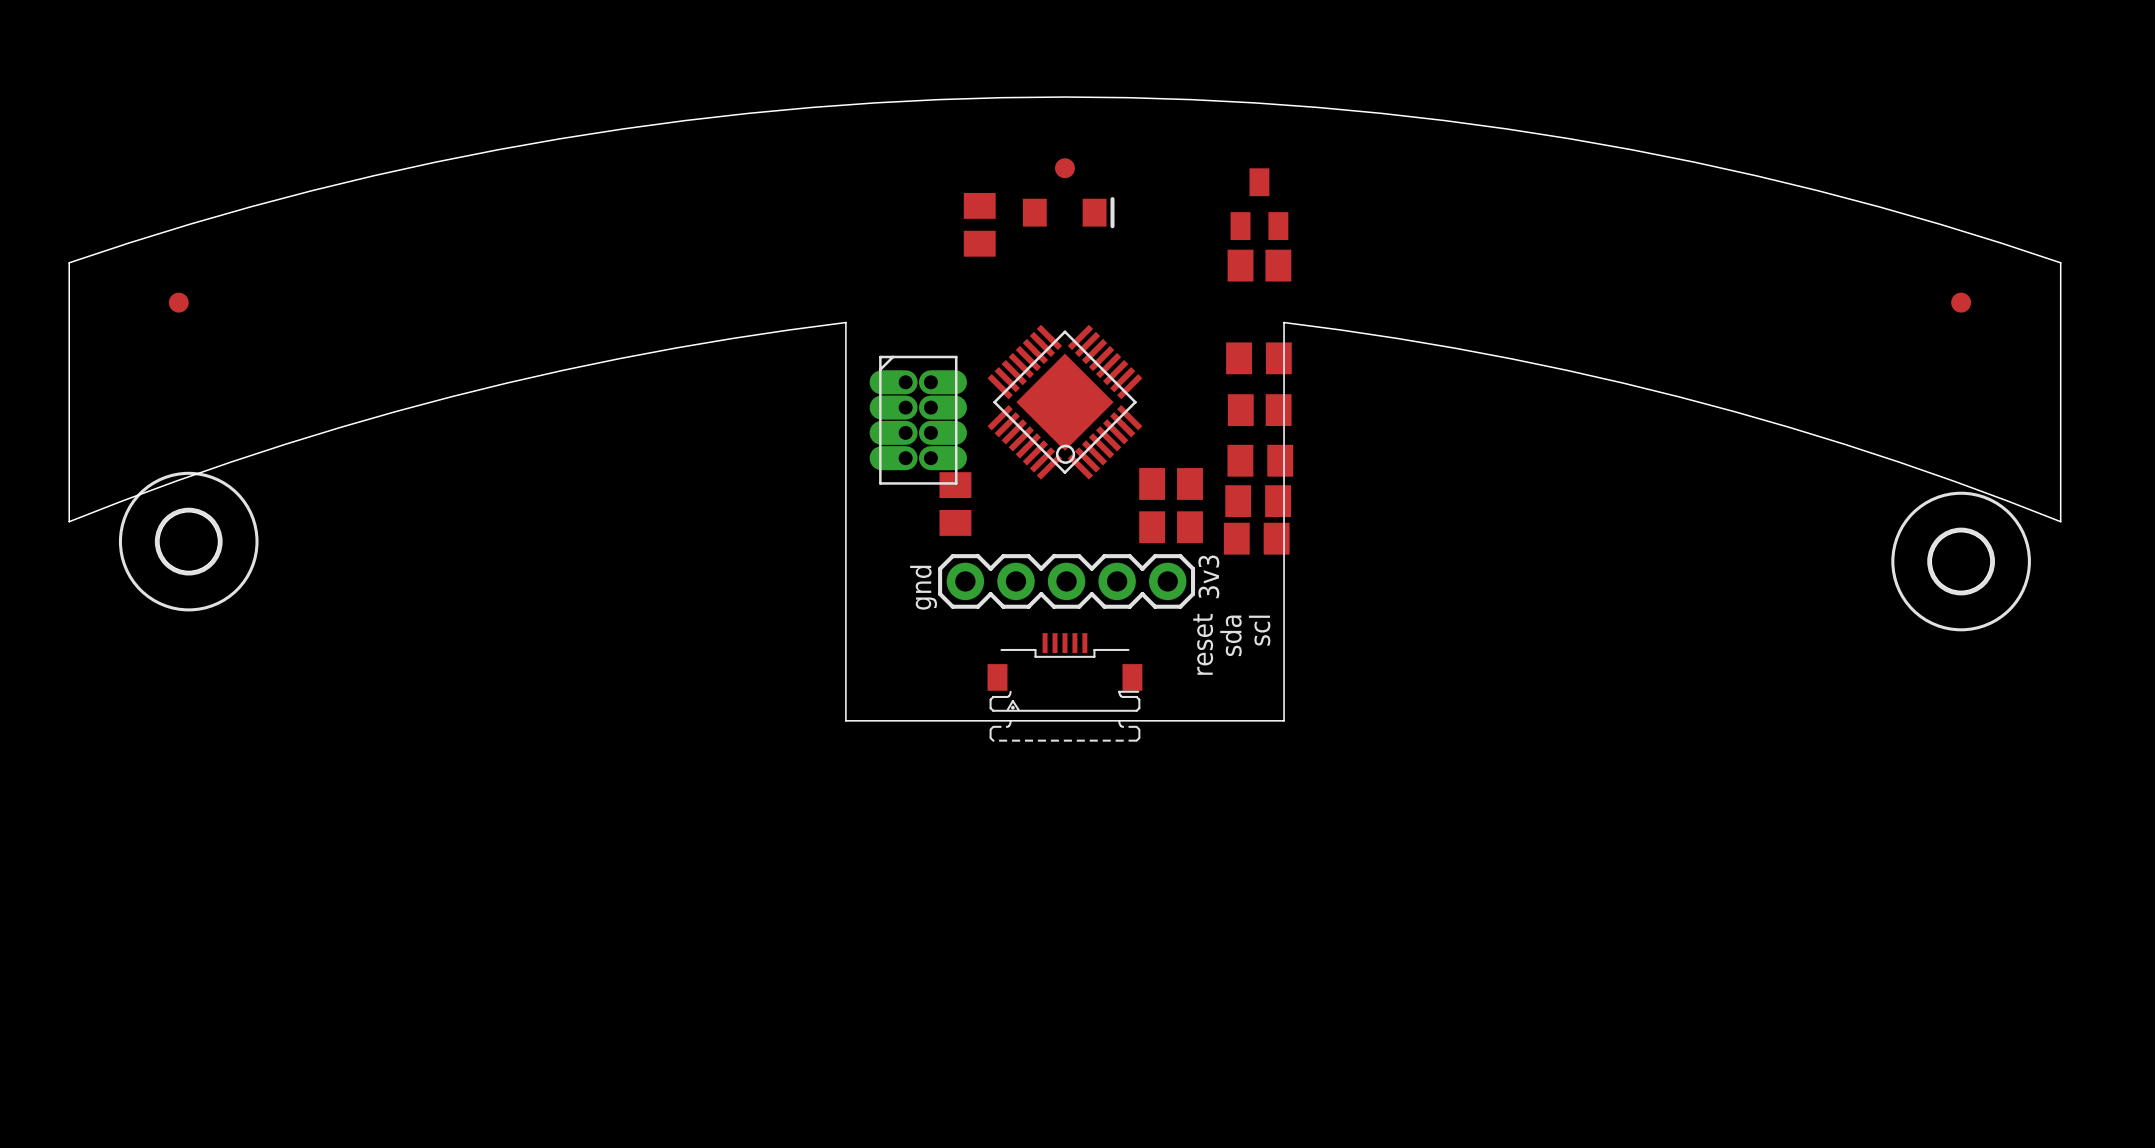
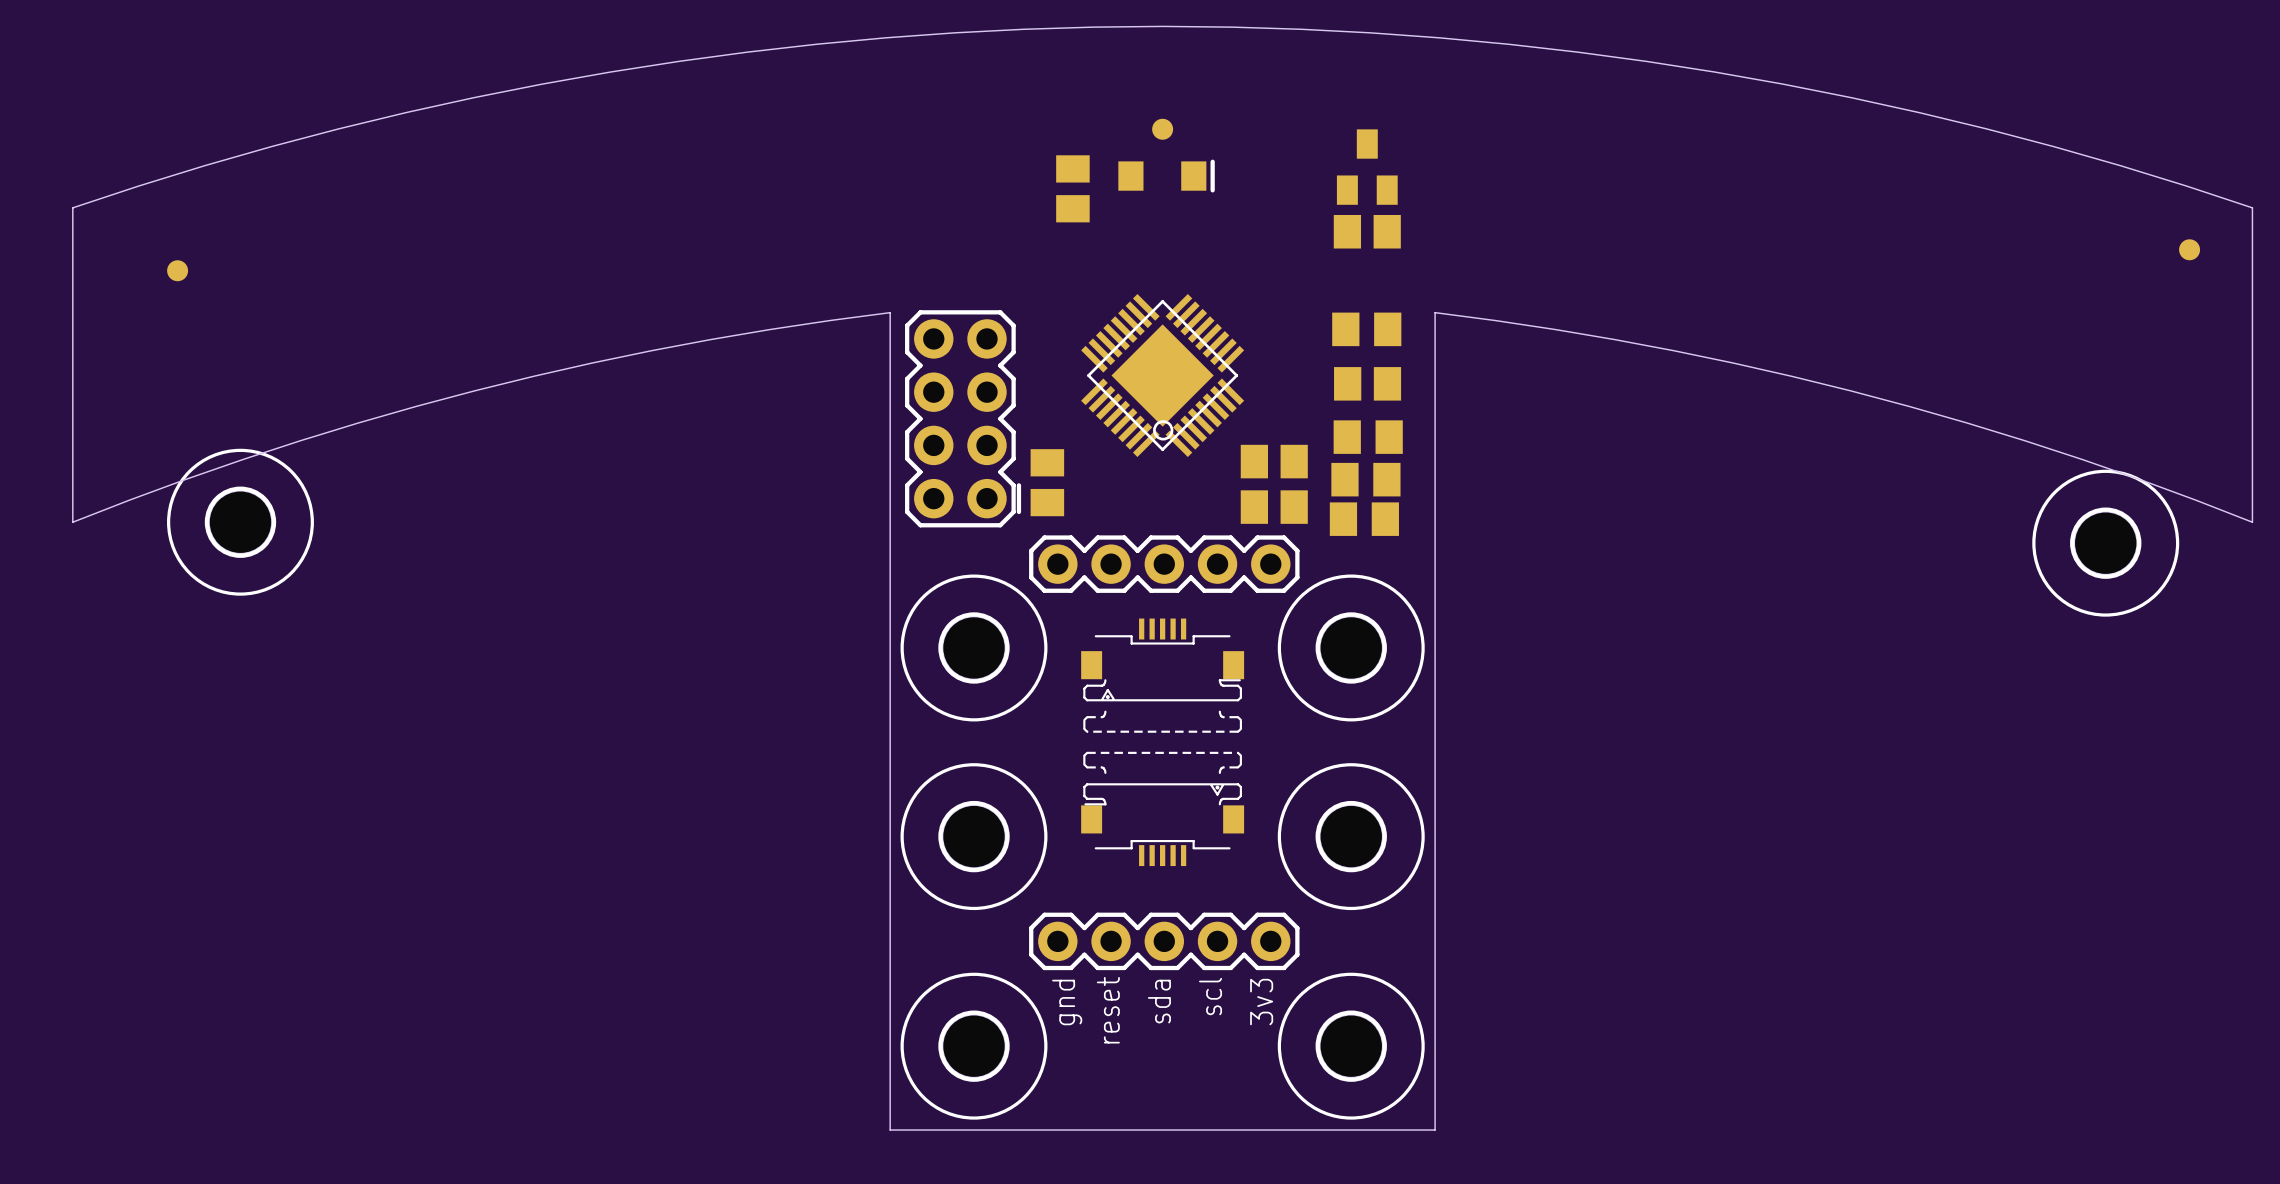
board edge: (69, 262) (69, 521) (230, 462) (340, 427) (451, 396) (619, 358) (732, 338) (845, 322) (845, 720) (1284, 720) (1284, 322) (1454, 348) (1567, 370) (1678, 396) (1844, 444) (1953, 480) (2060, 521) (2060, 262) (1879, 206) (1756, 175) (1632, 149) (1444, 120) (1254, 102) (1128, 97) (938, 99) (748, 113) (560, 138) (373, 175) (250, 206) (69, 262) -> (72, 207) (72, 522) (242, 459) (358, 423) (474, 390) (651, 350) (770, 329) (890, 312) (890, 1130) (1435, 1130) (1435, 312) (1614, 339) (1732, 362) (1850, 390) (2024, 440) (2139, 479) (2252, 522) (2252, 207) (2120, 165) (1986, 128) (1851, 97) (1646, 61) (1439, 37) (1231, 27) (1093, 27) (885, 37) (678, 61) (473, 97) (271, 146) (72, 207)
part position: (178, 302) -> (177, 270)
part position: (1961, 302) -> (2189, 249)
part: (918, 420) -> none
part: none -> (963, 418)
text position: 3v3 (1208, 576) -> 3v3 (1261, 1002)
text position: gnd (923, 587) -> gnd (1067, 1002)
text position: scl (1259, 630) -> scl (1210, 996)
text position: sda (1230, 635) -> sda (1159, 1001)
text position: reset (1203, 644) -> reset (1108, 1010)
part: none -> (974, 647)
part: none -> (1351, 647)
part: none -> (1162, 808)
part: none -> (974, 836)
part: none -> (1351, 836)
part: none -> (1164, 941)
part: none -> (974, 1046)
part: none -> (1351, 1046)

